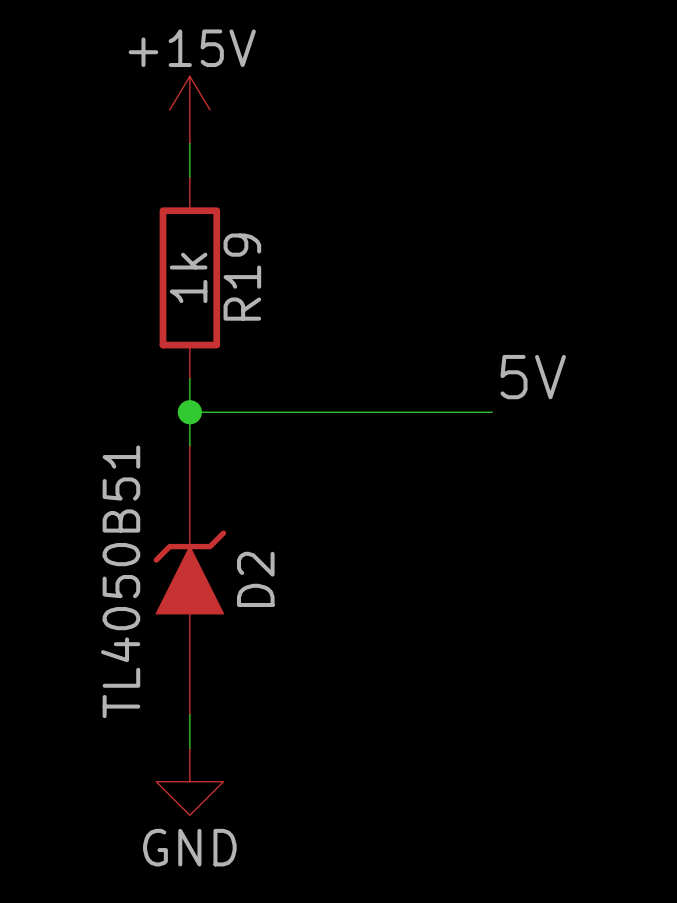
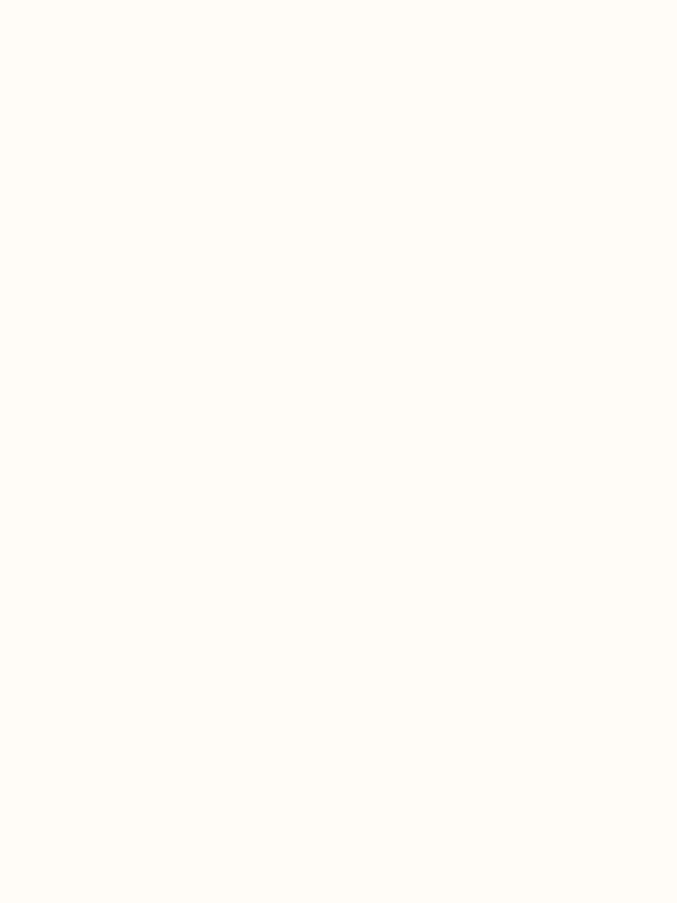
power symbol: +15V (189, 109) -> none
wire: (189, 143) (189, 177) -> none
R19: 1k (189, 277) -> none
label: 5V (533, 377) -> none
wire: (189, 378) (189, 445) -> none
wire: (189, 412) (492, 412) -> none
junction: (189, 412) -> none
D2: TL4050B51 (189, 580) -> none
wire: (189, 714) (189, 748) -> none
power symbol: GND (189, 781) -> none

